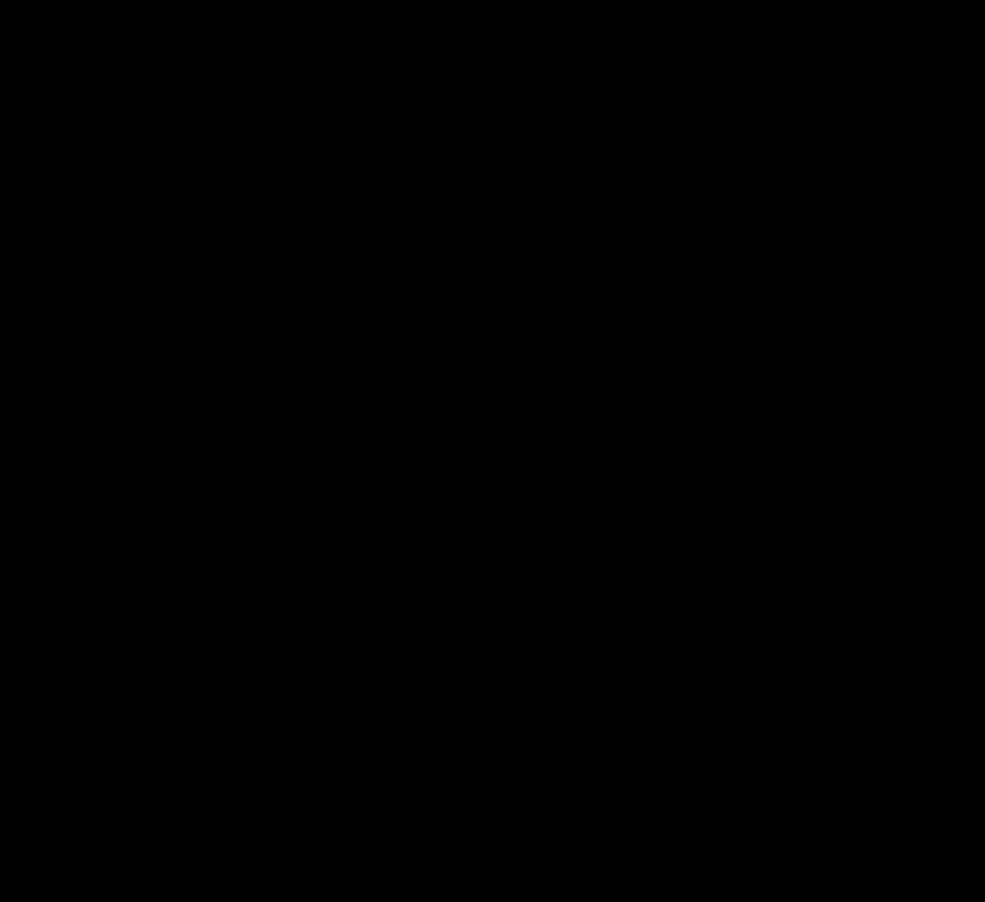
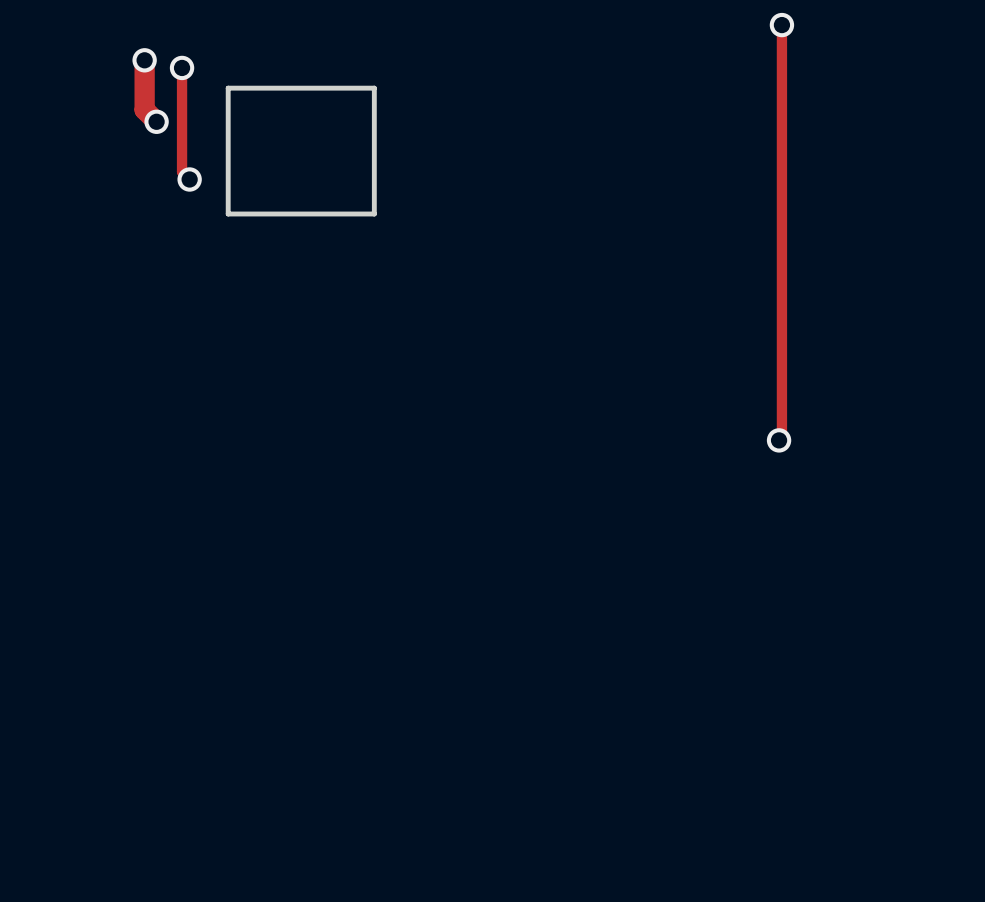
track: none -> (781, 25) (781, 437) (779, 440)
via: none -> (781, 25)
track: none -> (144, 60) (144, 109) (156, 121)
via: none -> (144, 60)
track: none -> (182, 67) (182, 171) (189, 179)
via: none -> (182, 67)
via: none -> (156, 121)
part: none -> (301, 151)
via: none -> (189, 179)
via: none -> (779, 440)

